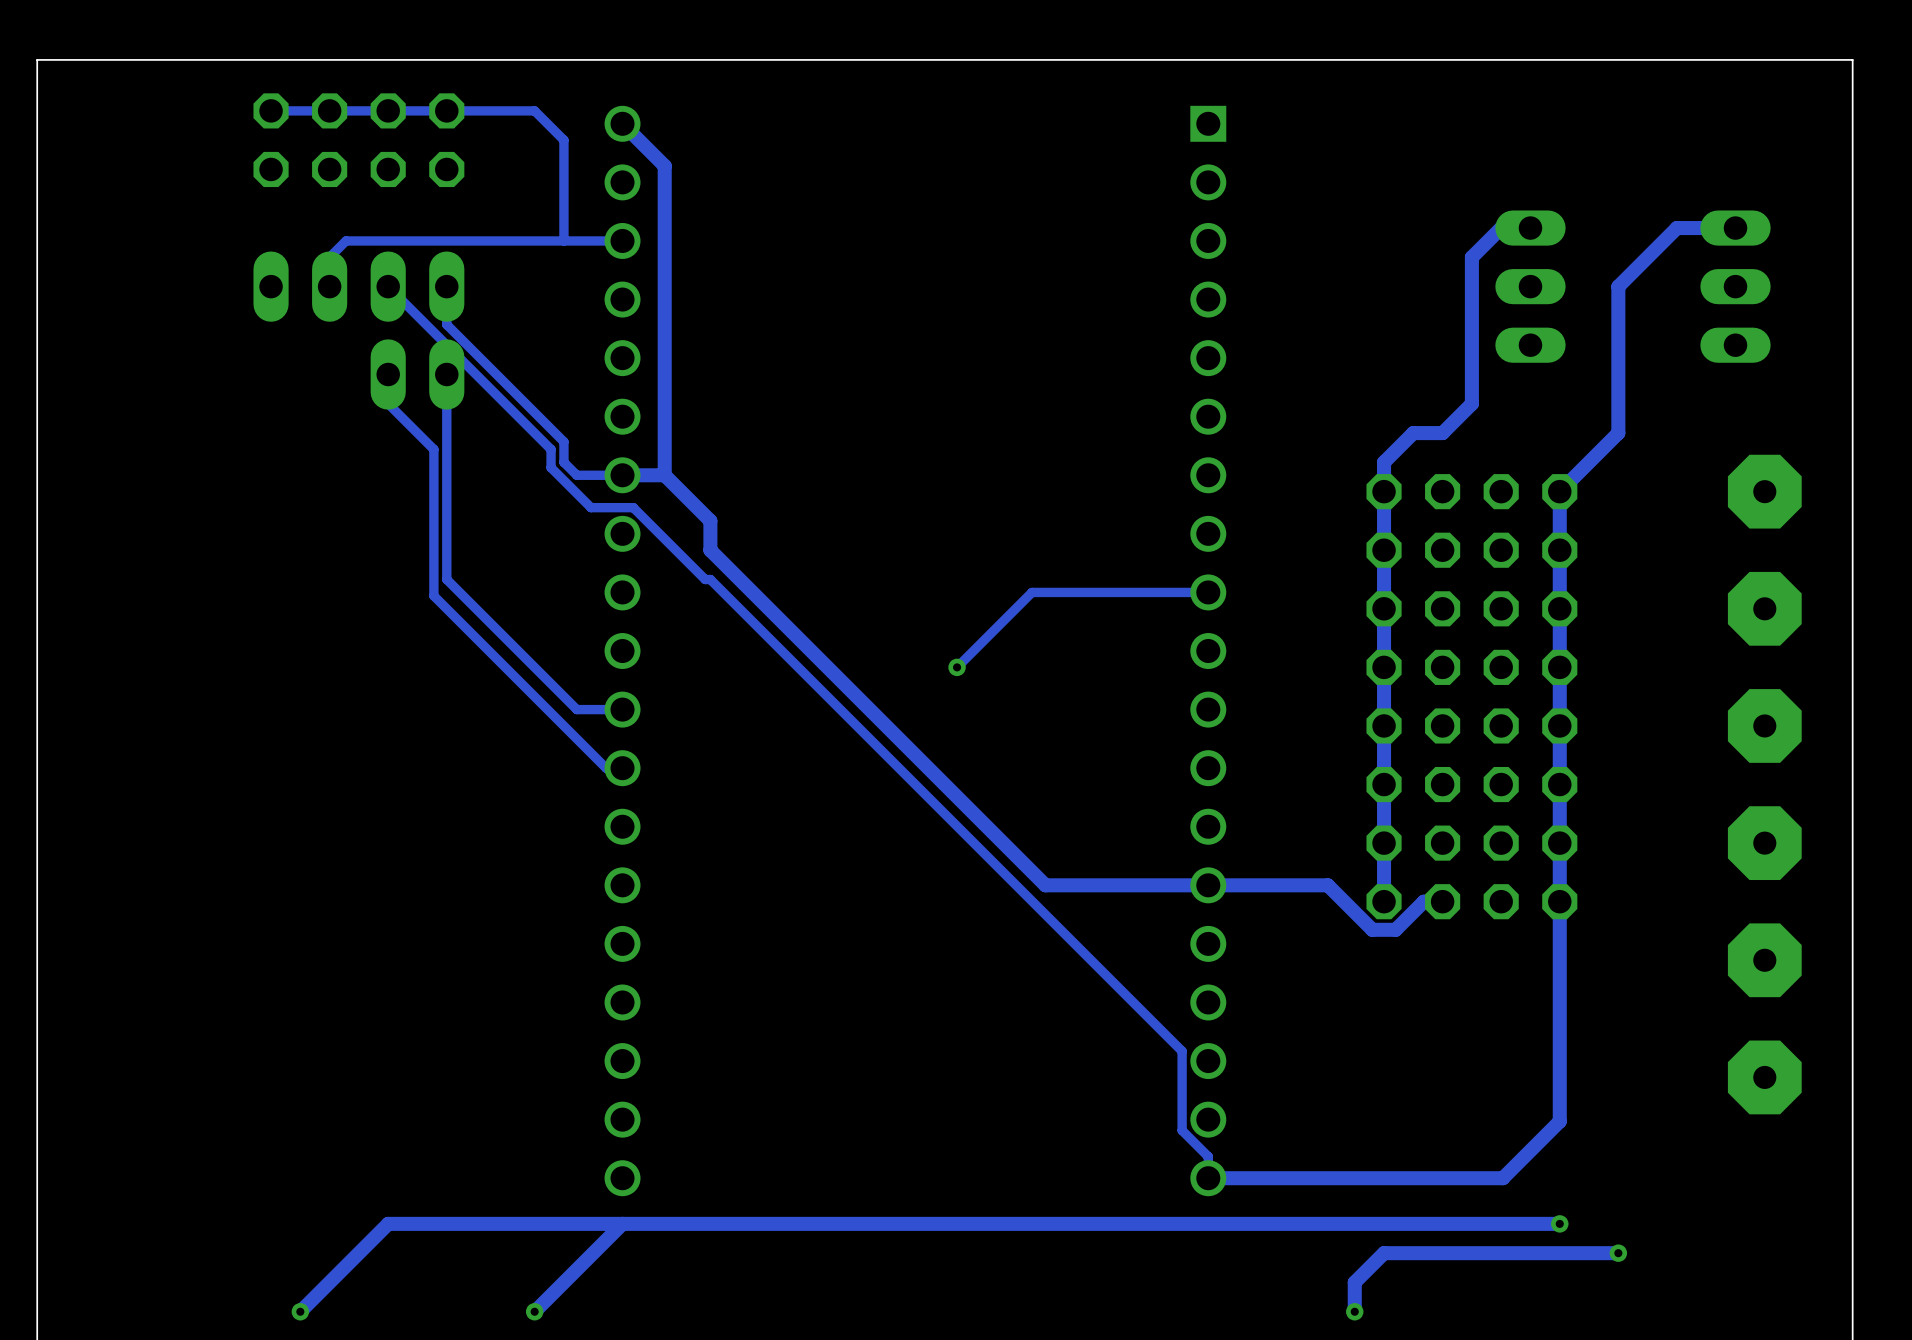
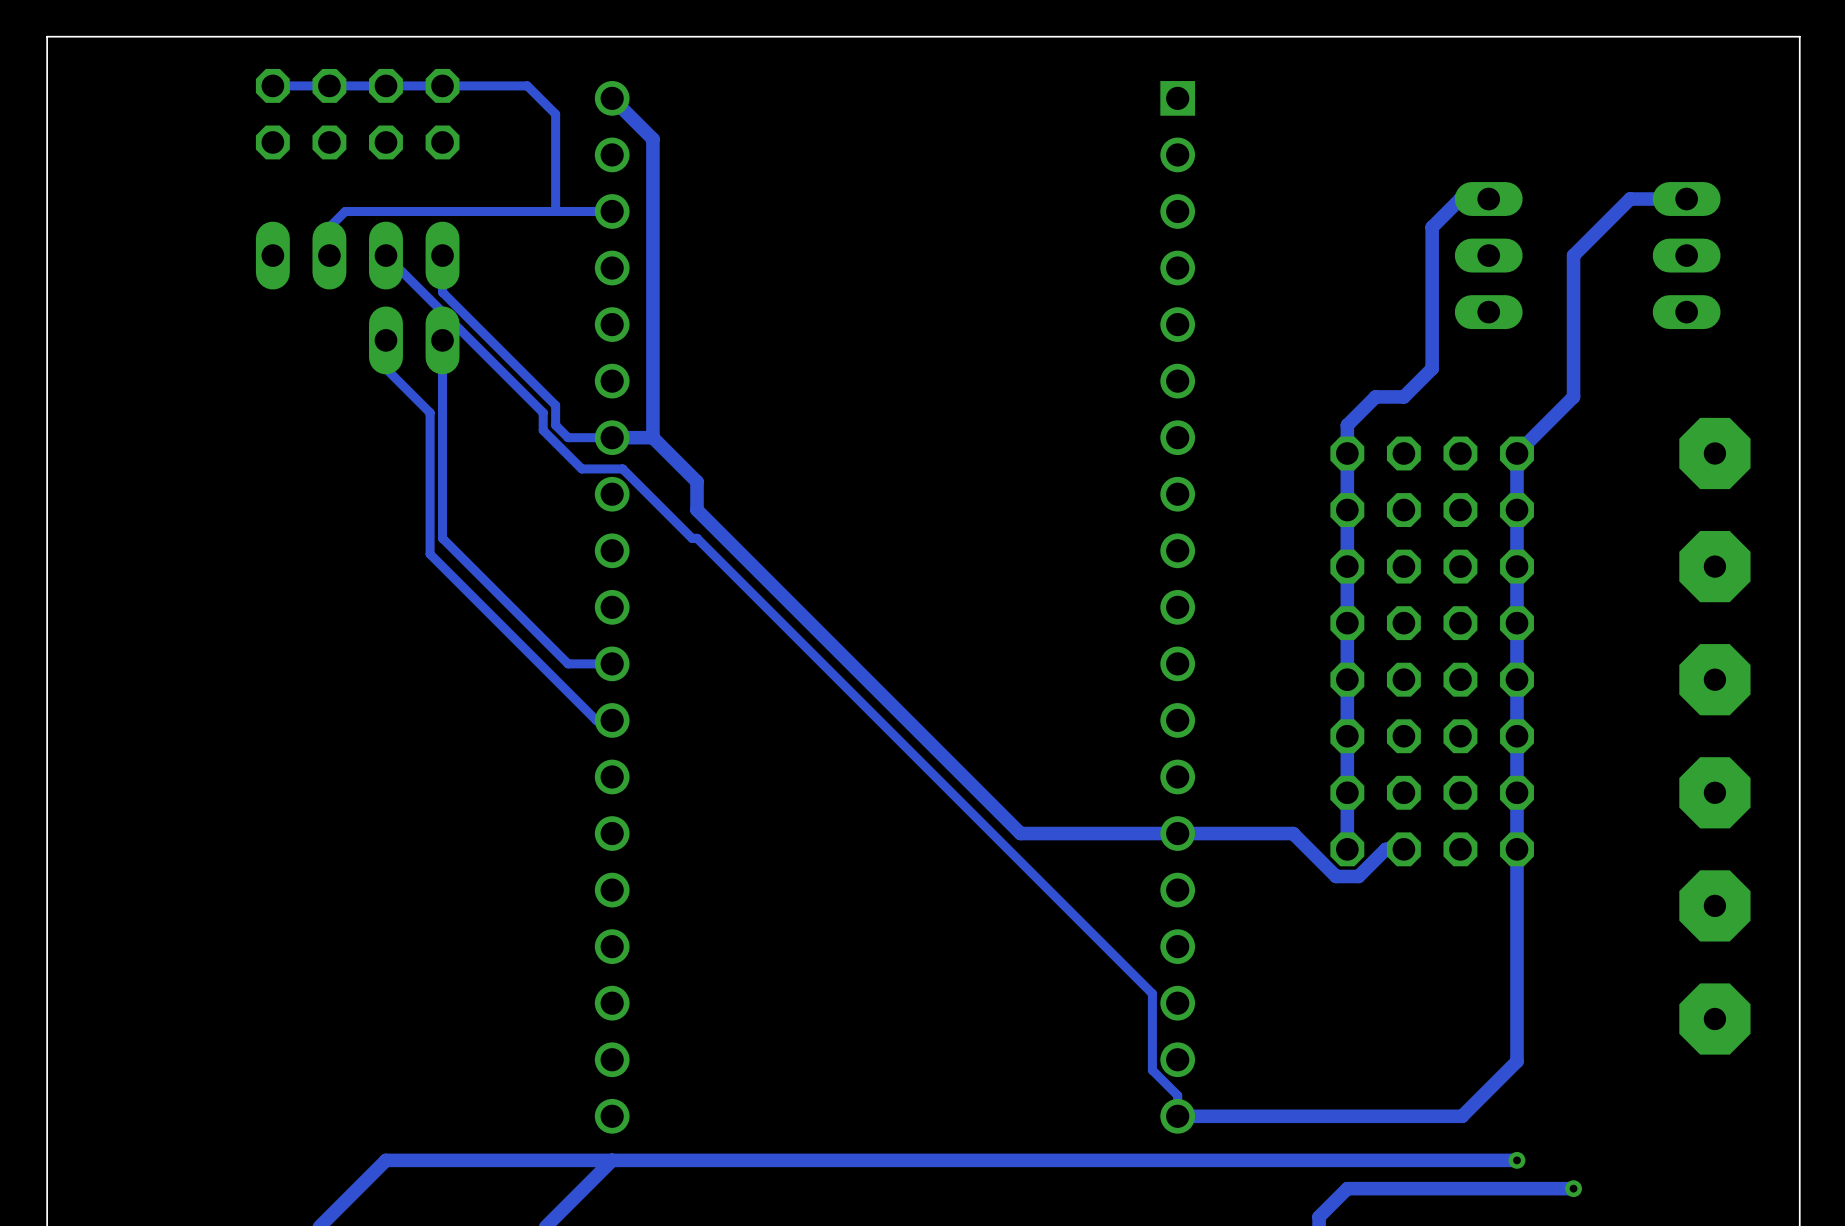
track: (1208, 592) (1032, 592) (957, 667) -> none
via: (957, 667) -> none

